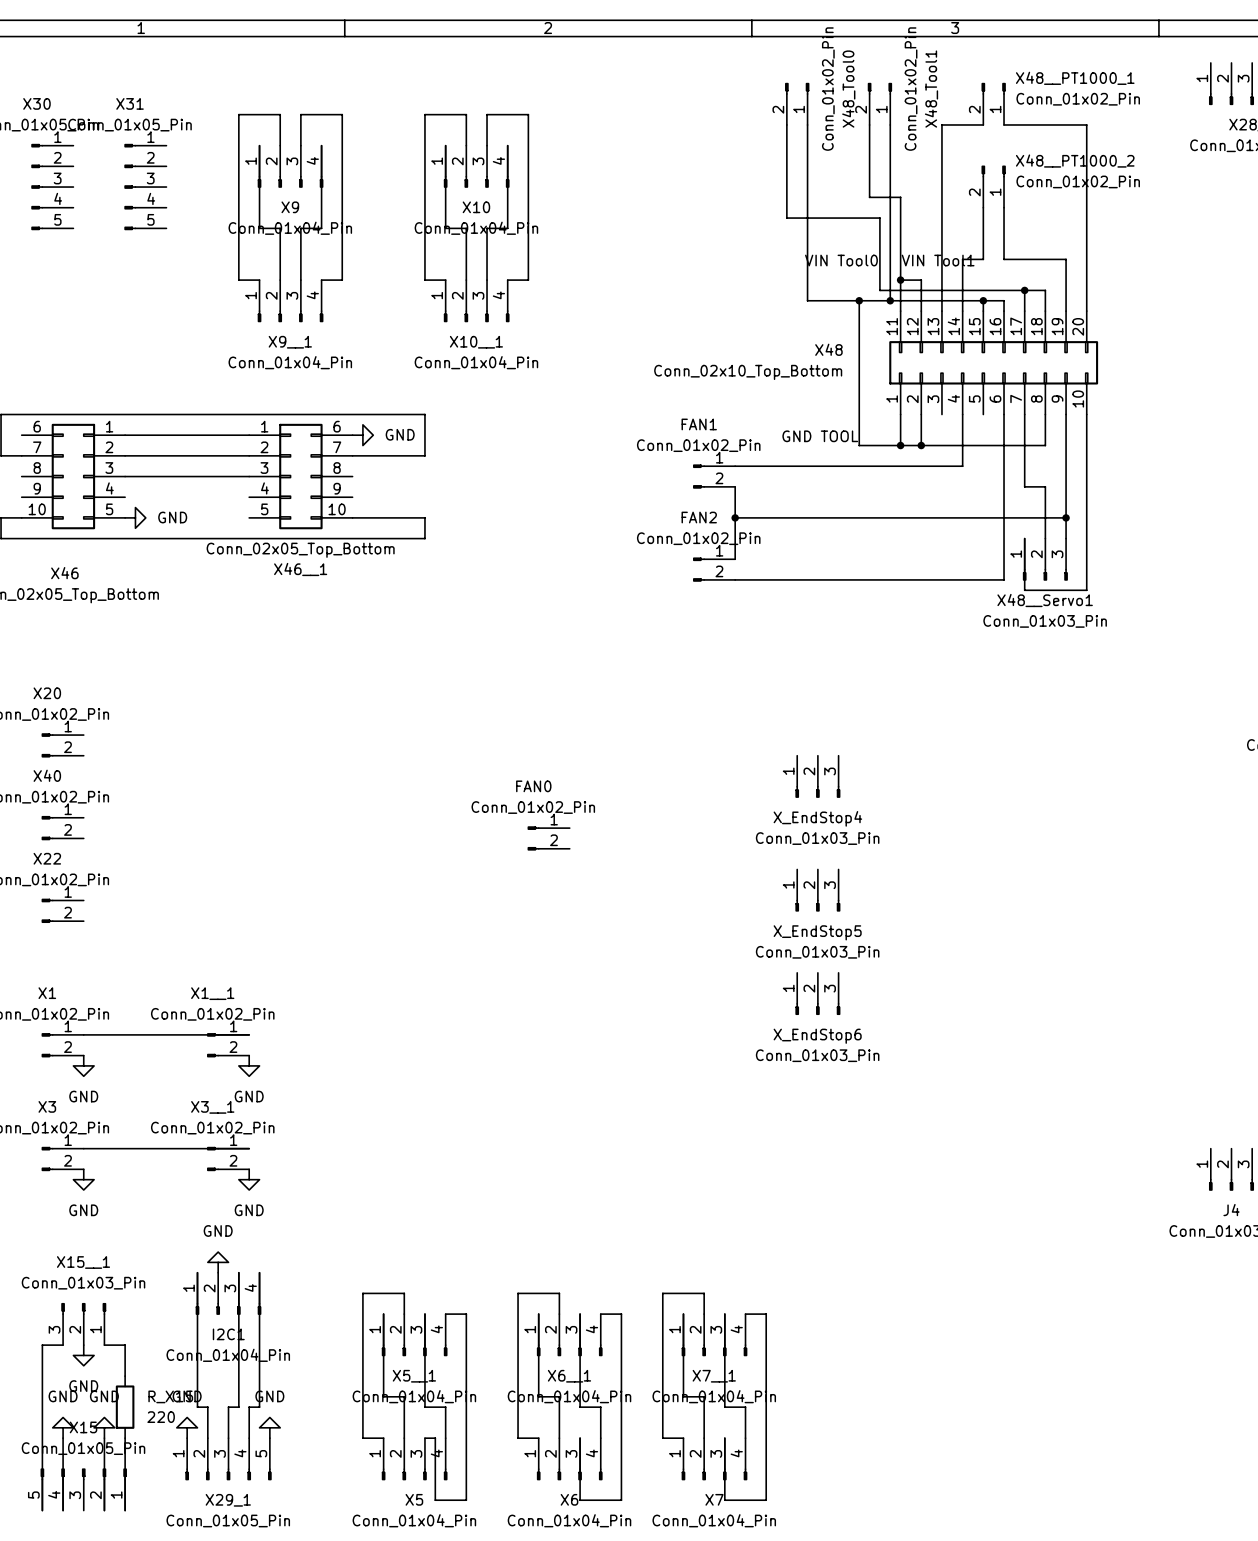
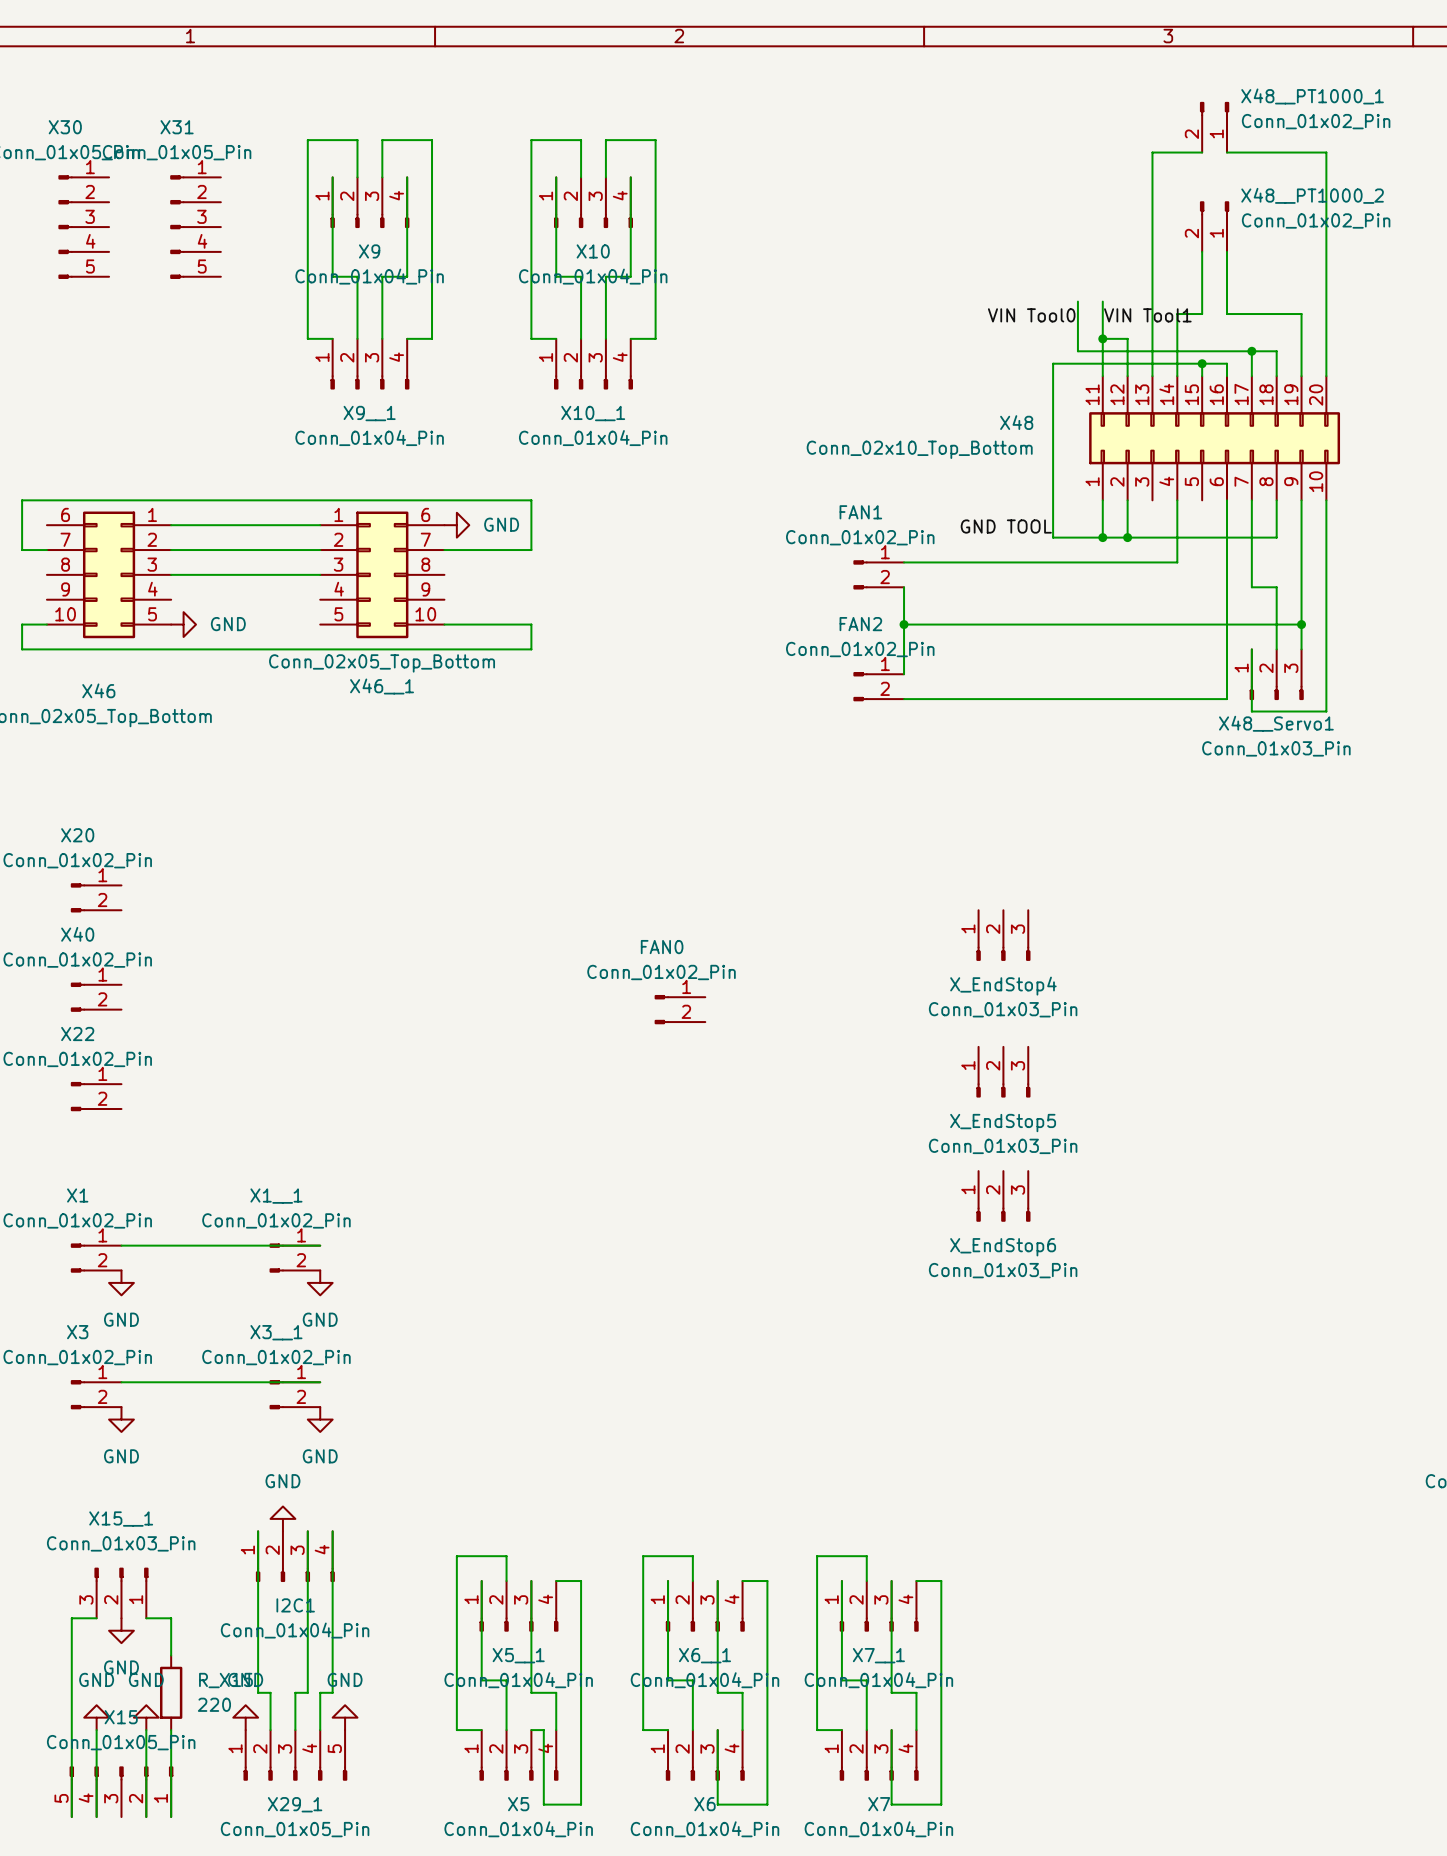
X48_Tool0: Conn_01x02_Pin (797, 104) -> none
X48_Tool1: Conn_01x02_Pin (879, 104) -> none
wire: (786, 124) (786, 218) (879, 218) (879, 249) -> none
wire: (807, 124) (807, 300) (859, 300) -> none
wire: (869, 124) (869, 197) (900, 197) (900, 249) -> none
wire: (890, 124) (890, 300) -> none
junction: (859, 300) -> none
junction: (890, 300) -> none

